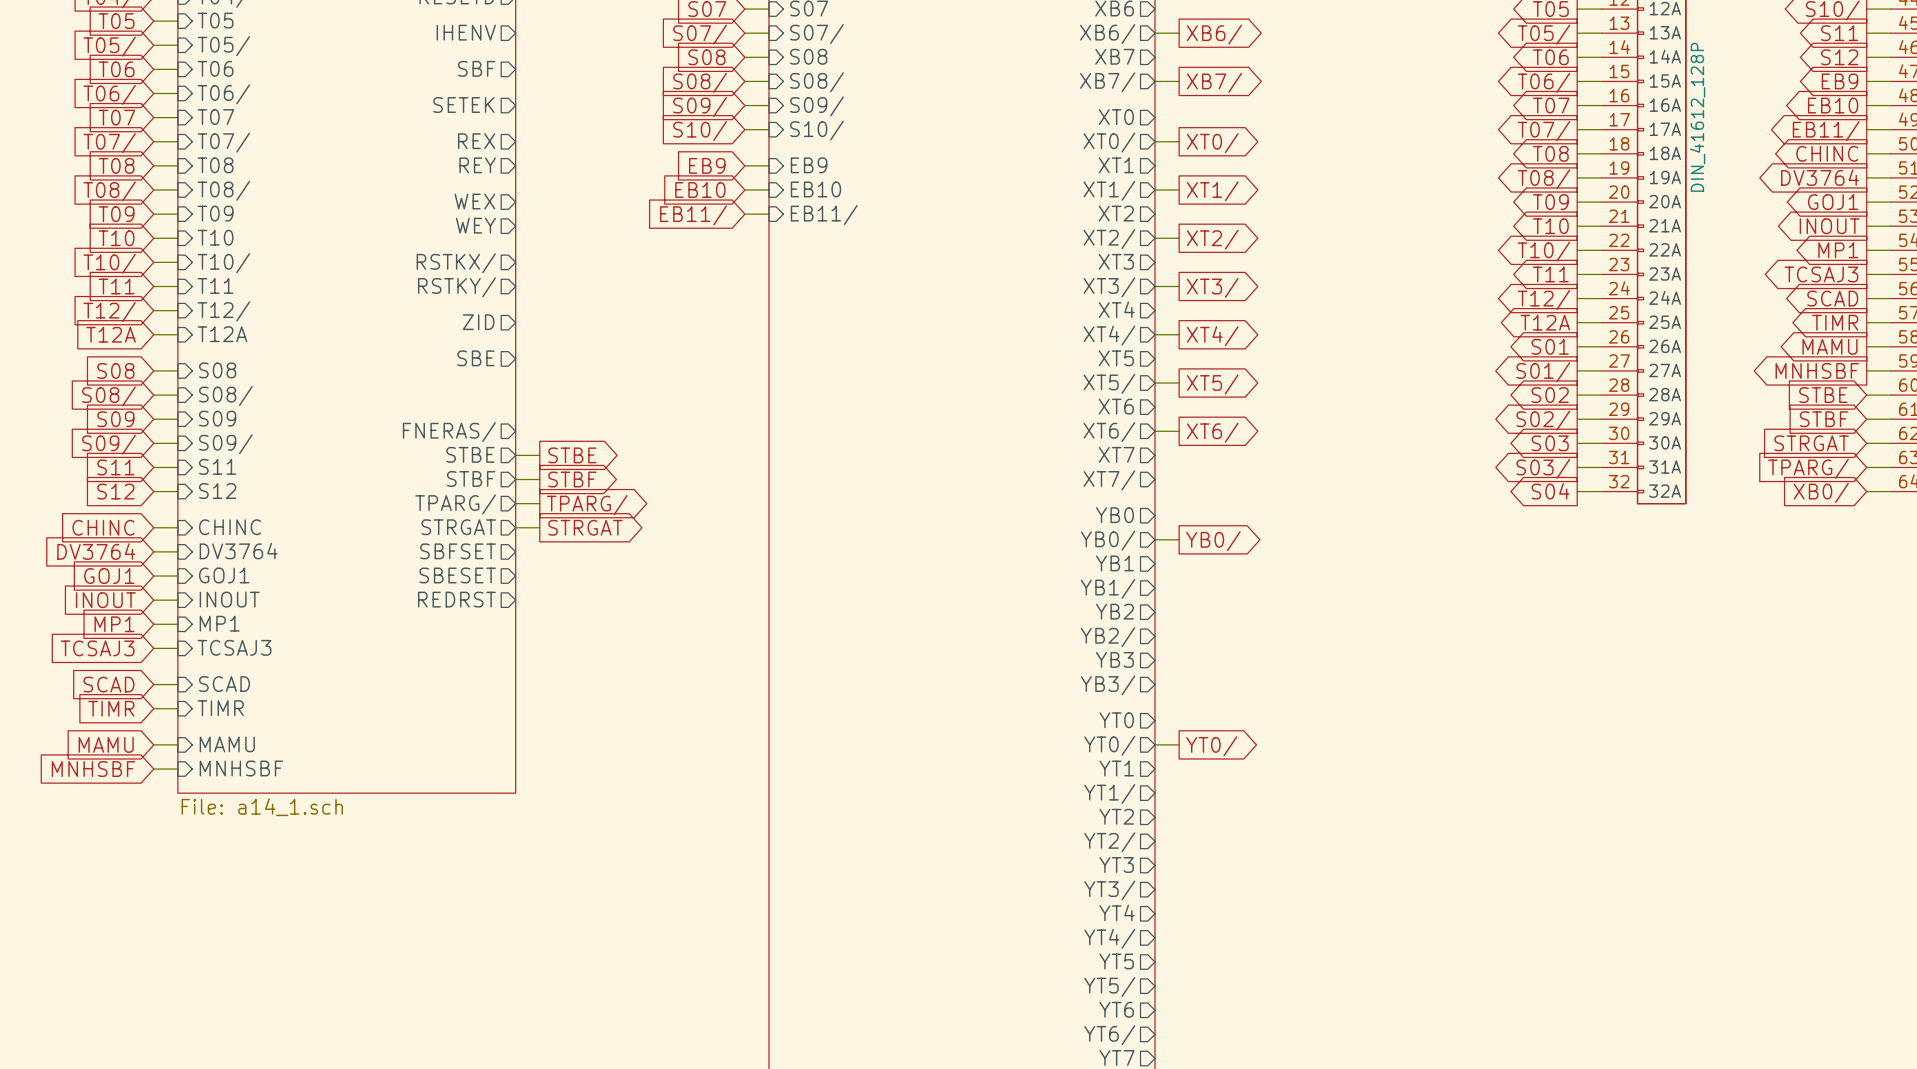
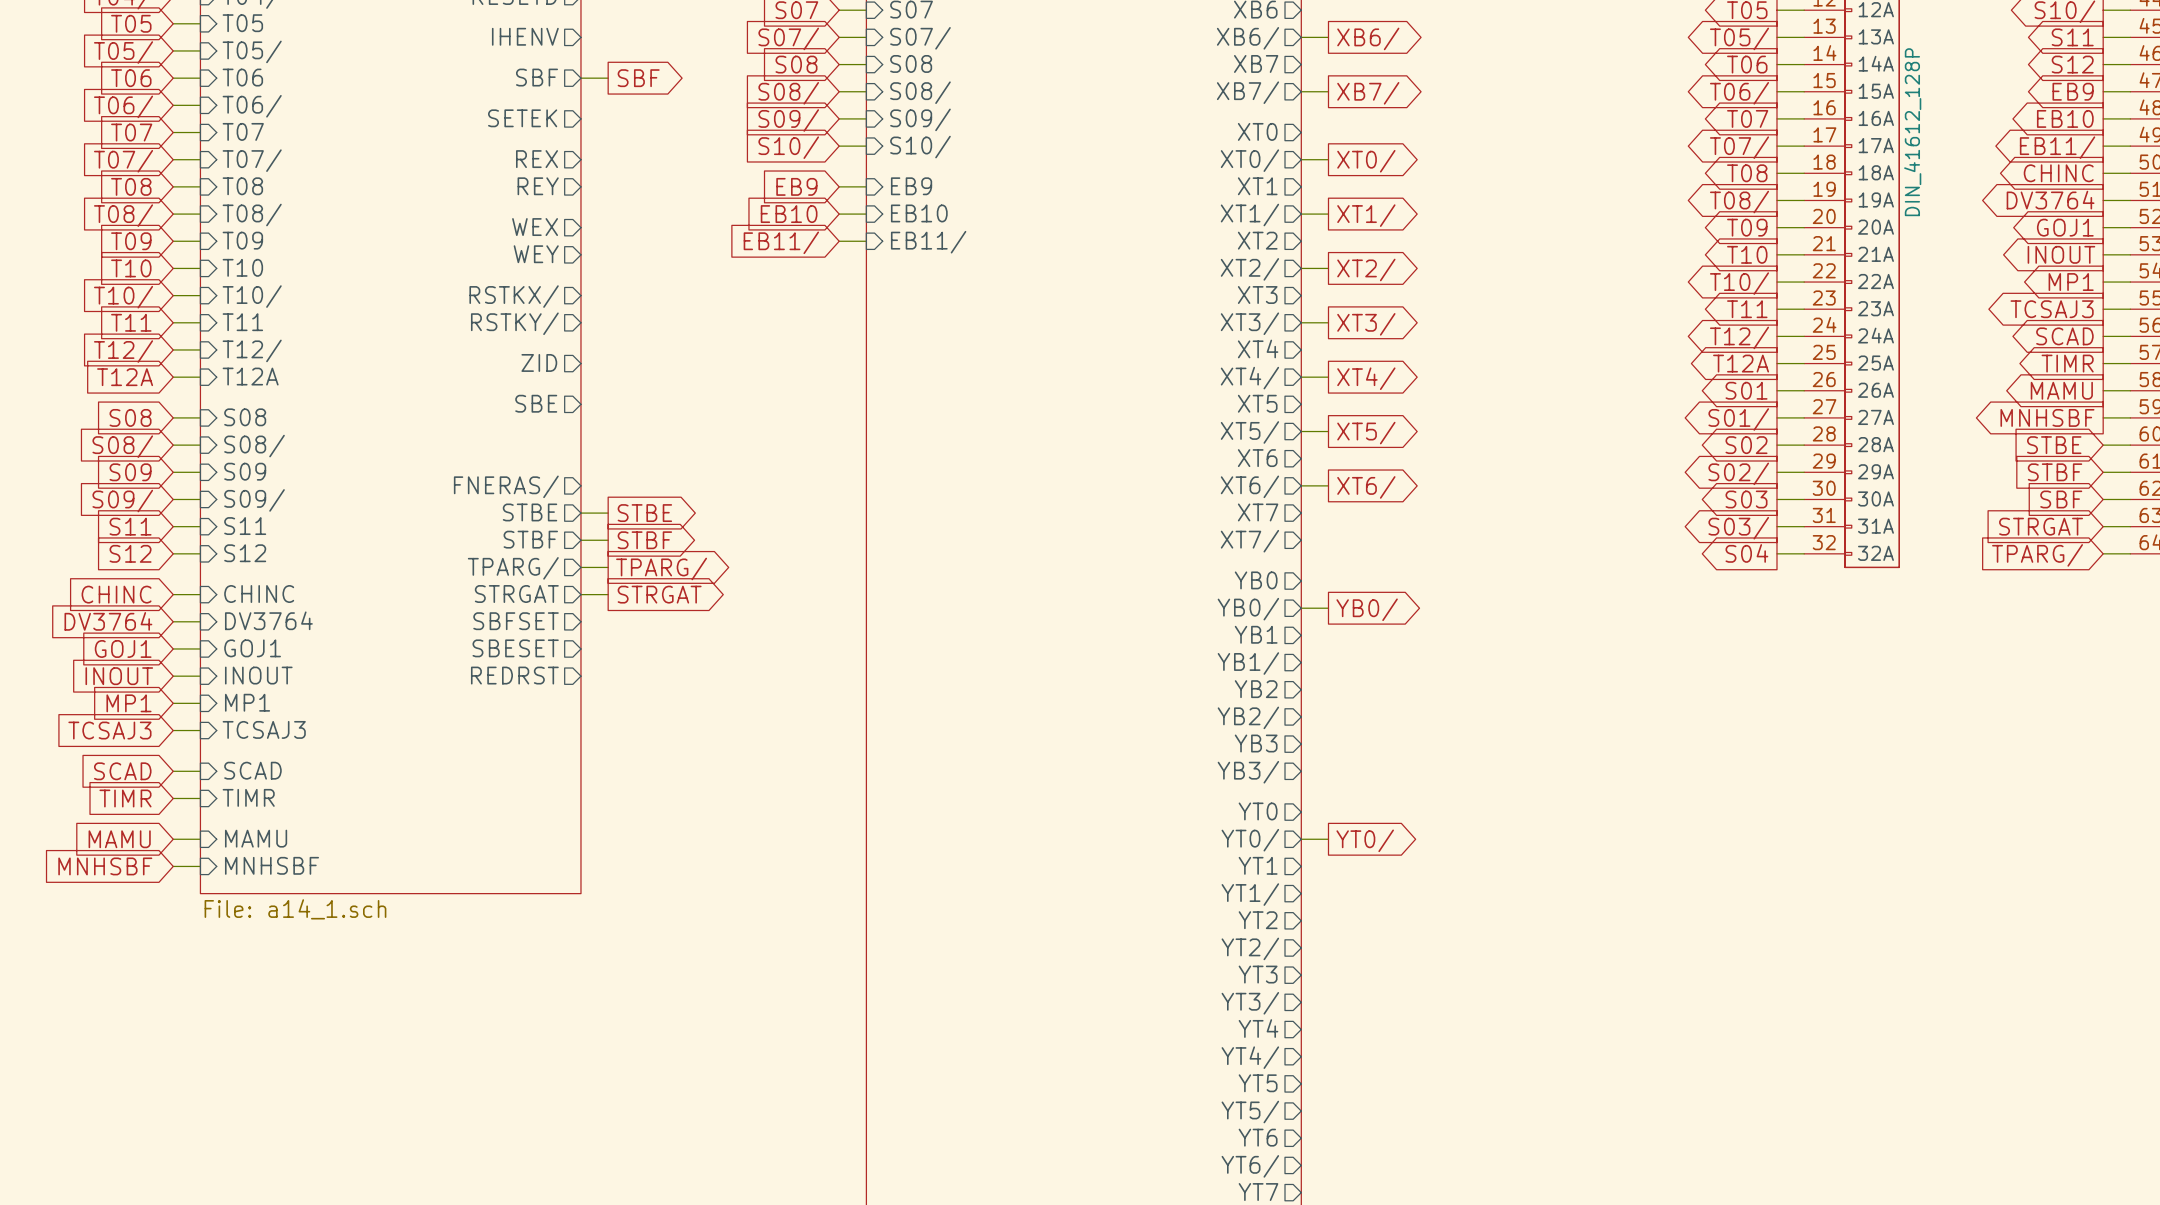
wire: none -> (580, 78) (608, 78)
global label: none -> SBF (638, 78)
global label: STRGAT (1811, 443) -> SBF (2061, 499)
global label: TPARG/ (1808, 468) -> STRGAT (2041, 526)
global label: XB0/ (1821, 492) -> TPARG/ (2037, 555)

